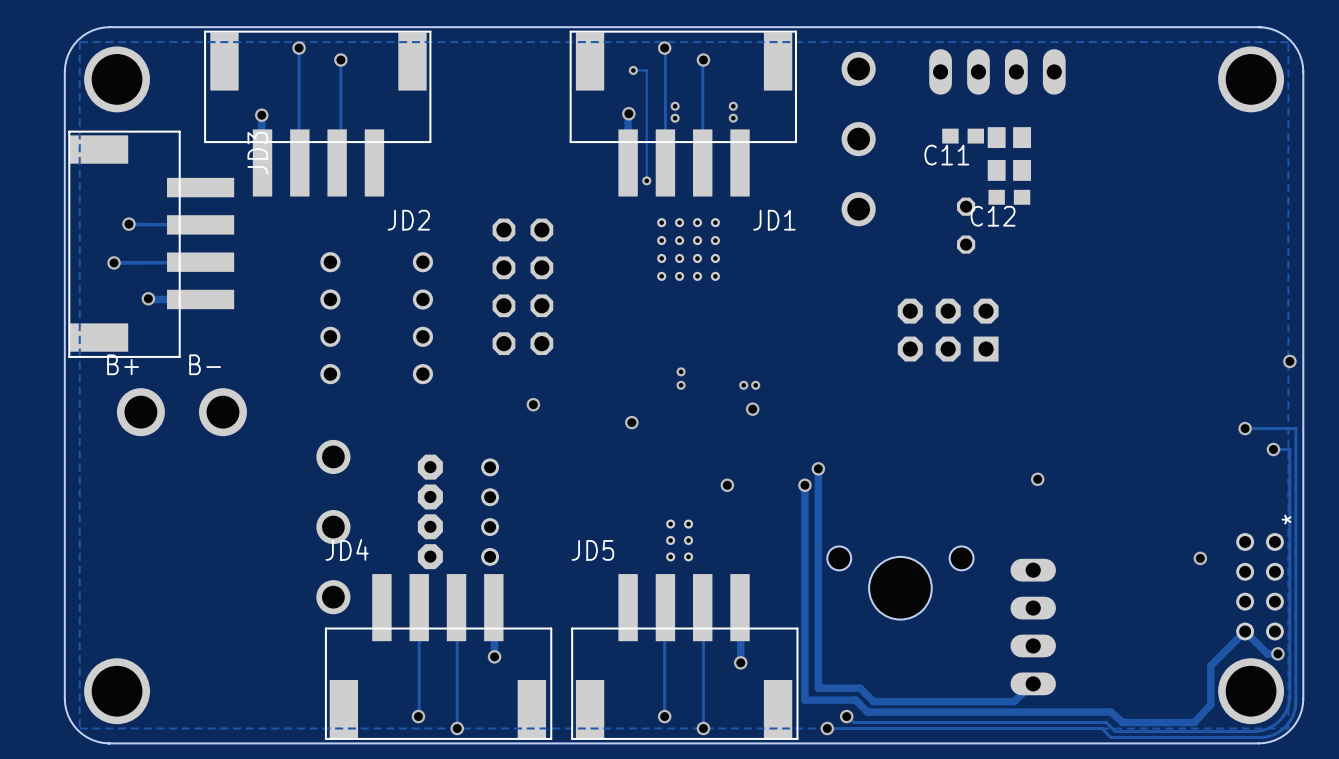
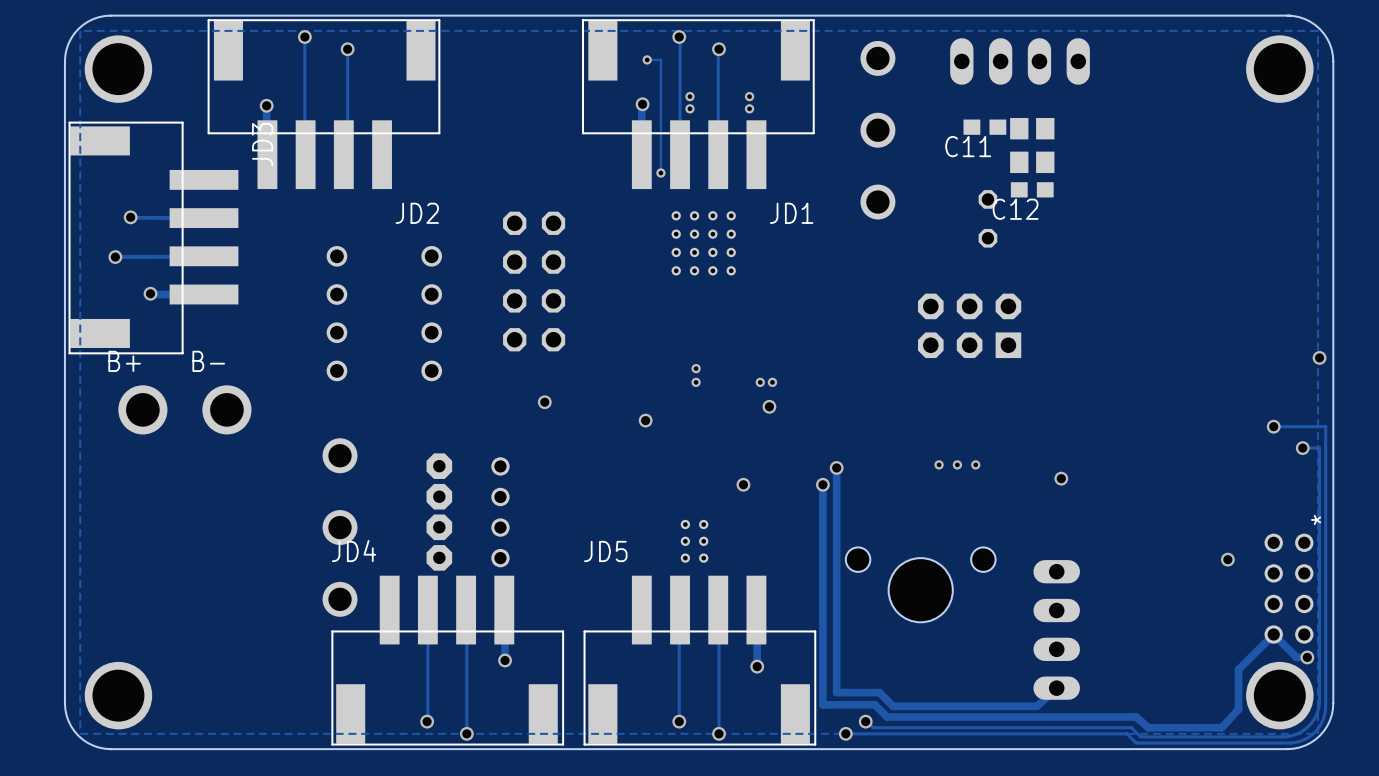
via: none -> (939, 464)
via: none -> (957, 464)
via: none -> (975, 464)

